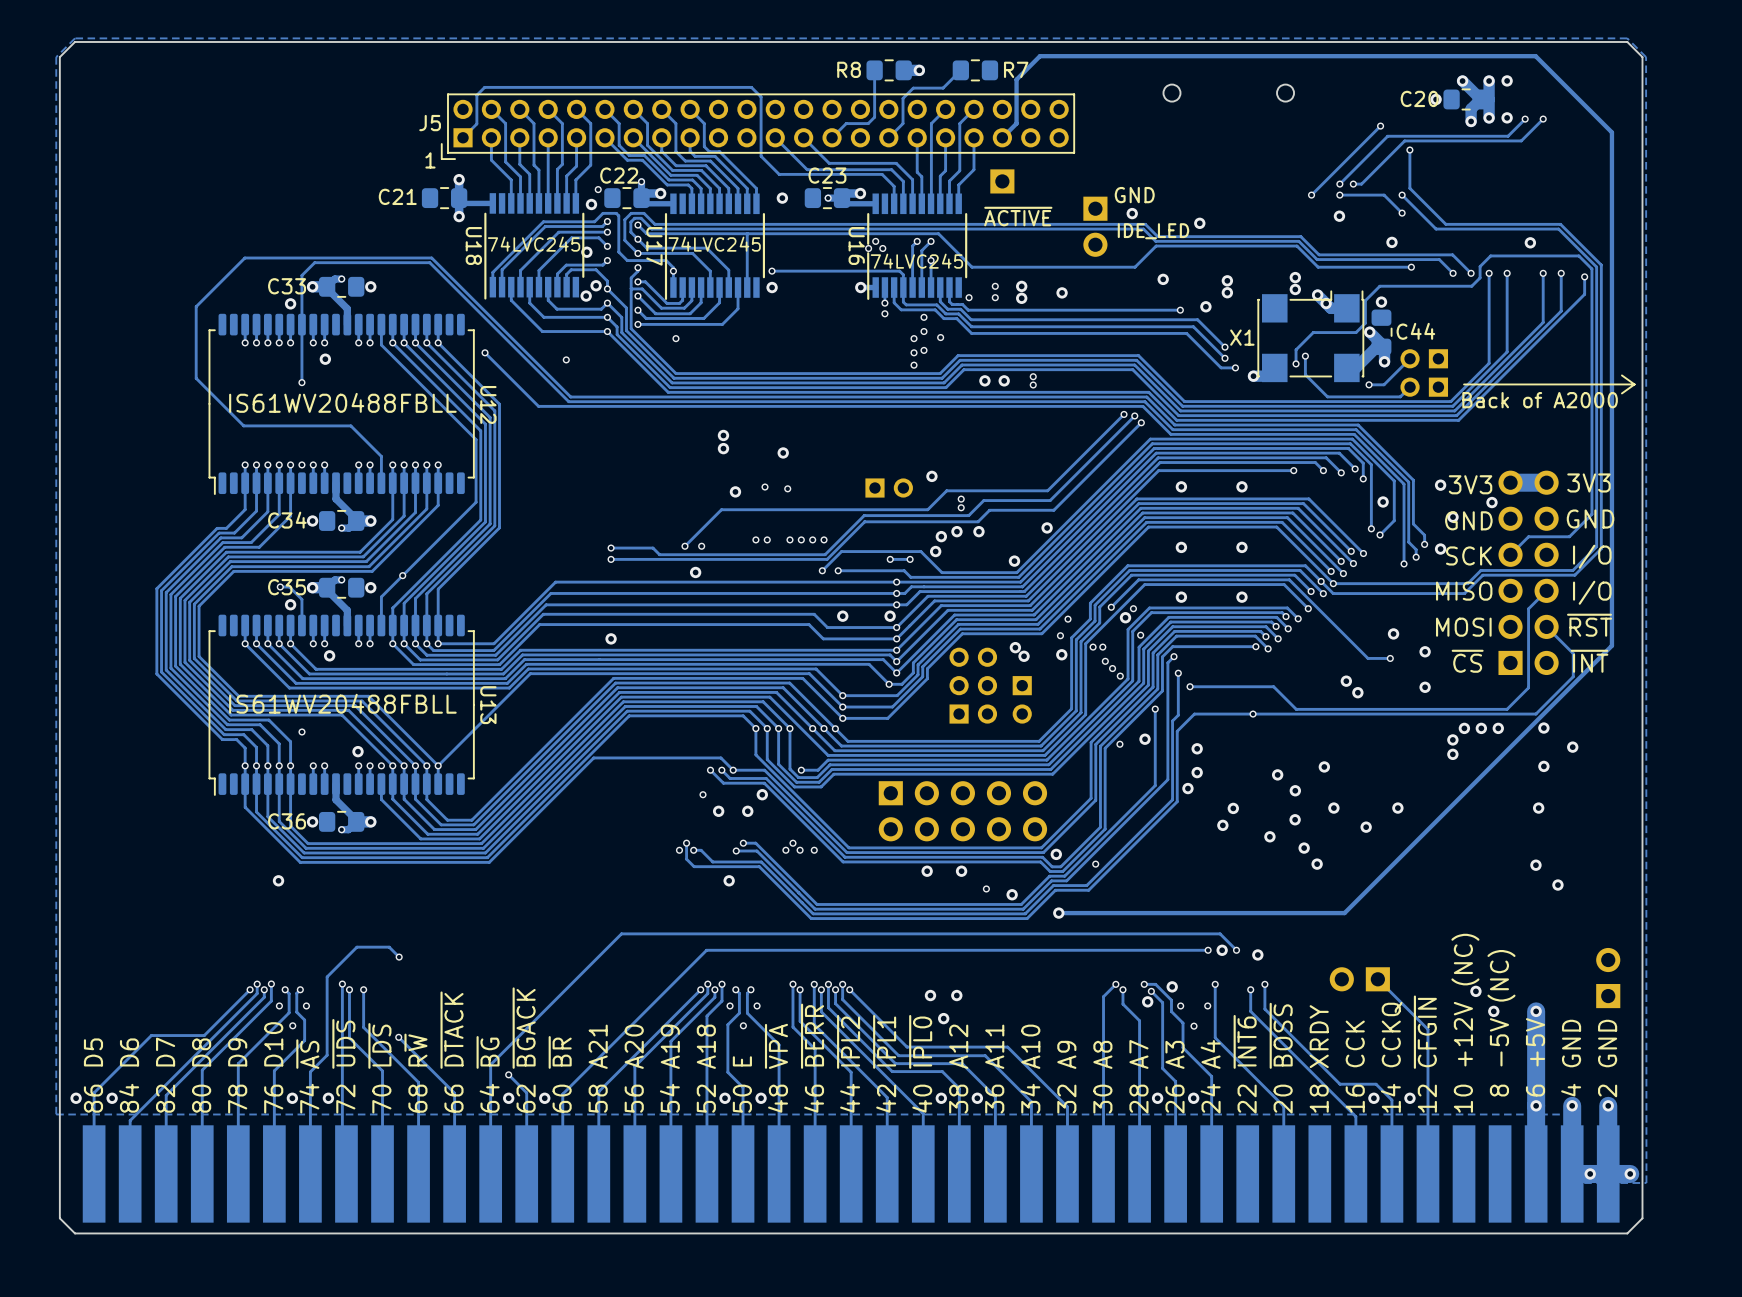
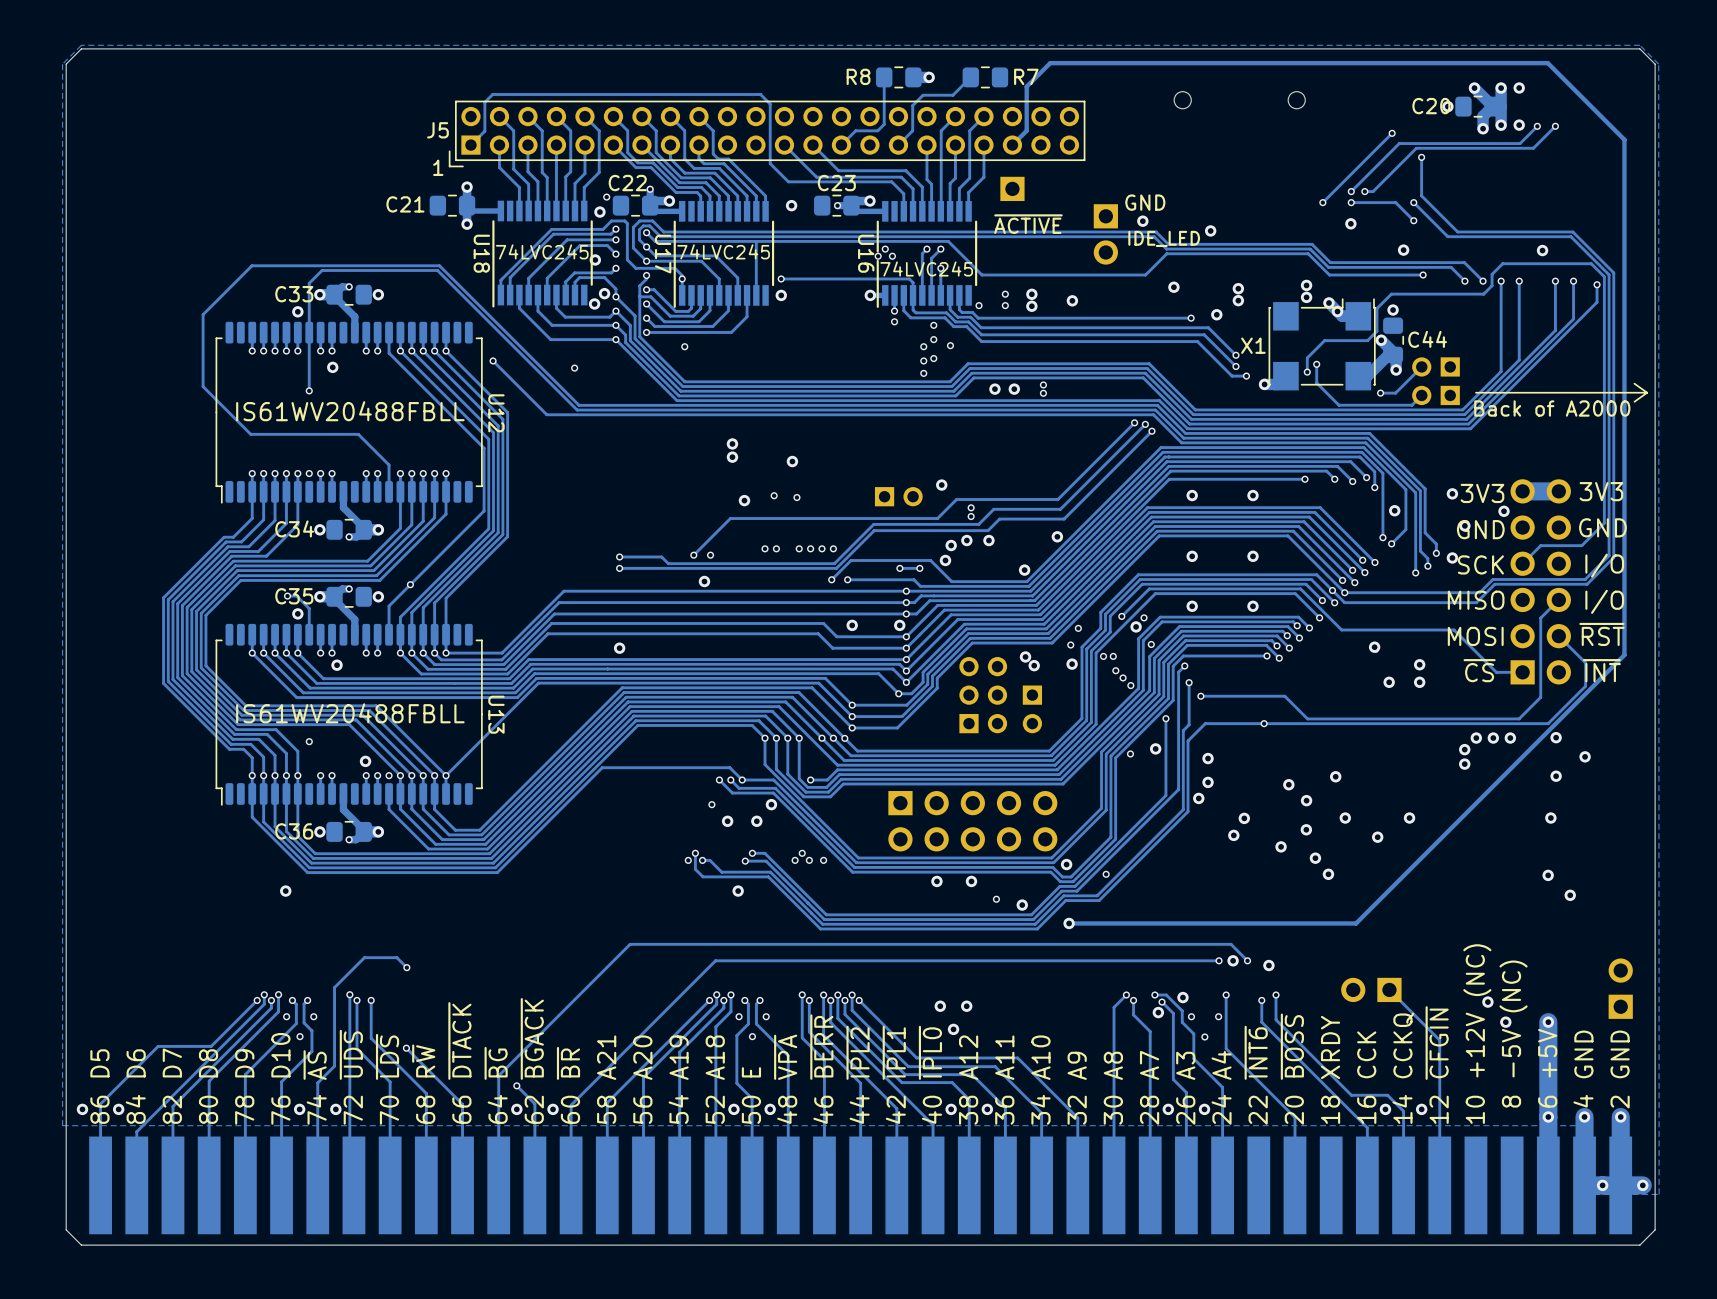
track: (1330, 620) (1368, 658) (1390, 658) -> (1341, 630) (1454, 630) (1496, 672) (1522, 672)
via: (1393, 633) -> none
via: none -> (1374, 647)
via: (1425, 651) -> none
via: none -> (1419, 664)
via: (1390, 658) -> none
via: none -> (1389, 682)
via: none -> (1419, 682)
via: (1346, 681) -> none
via: (1425, 687) -> none
via: (1357, 692) -> none

